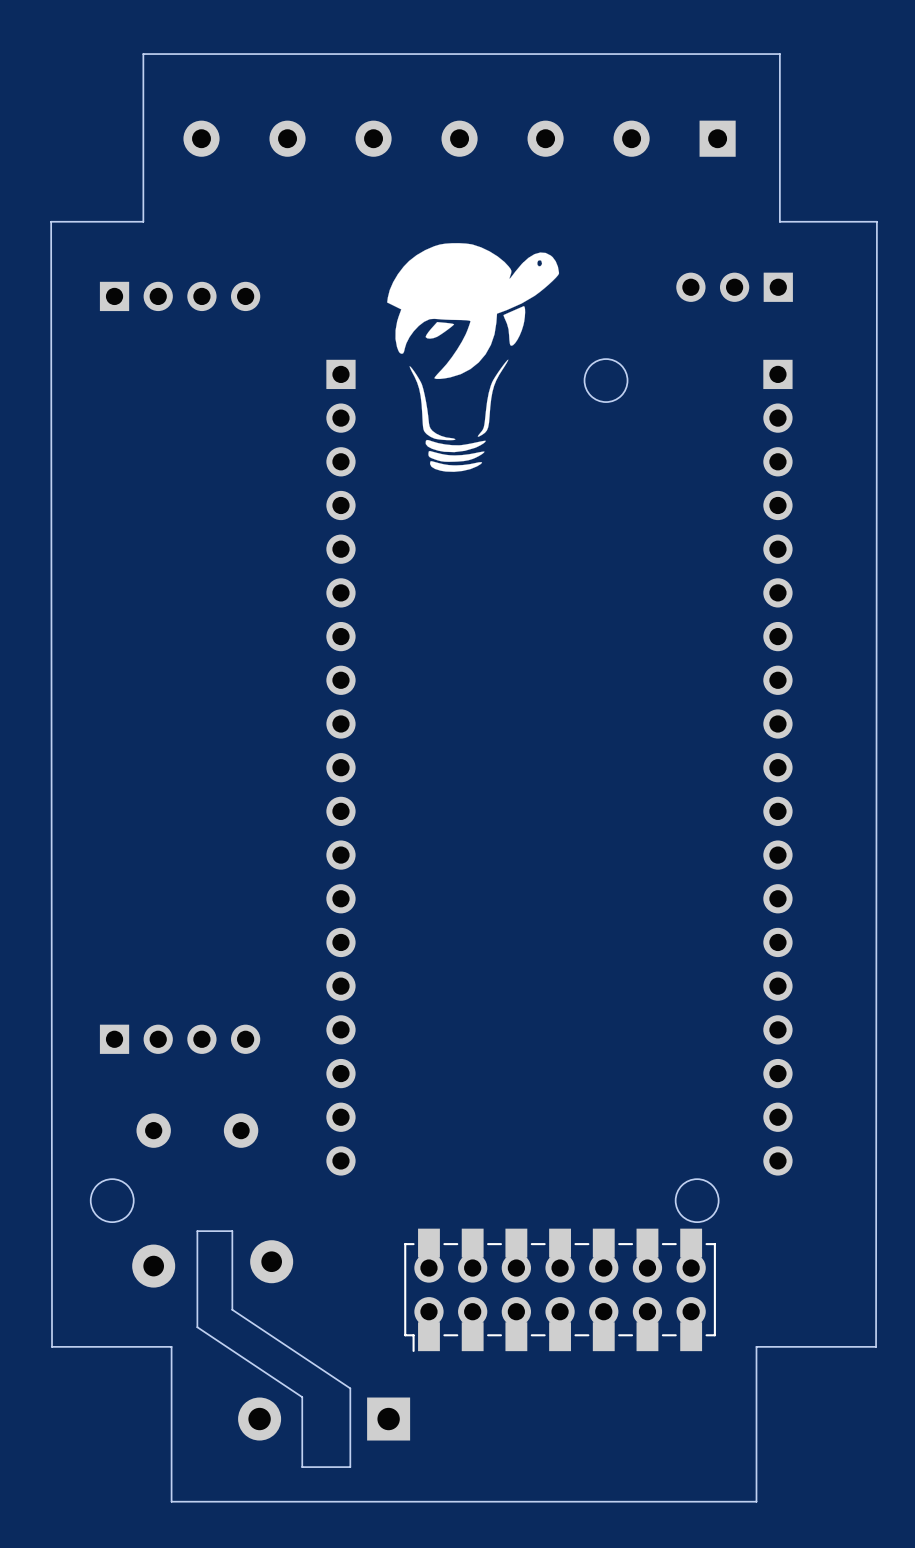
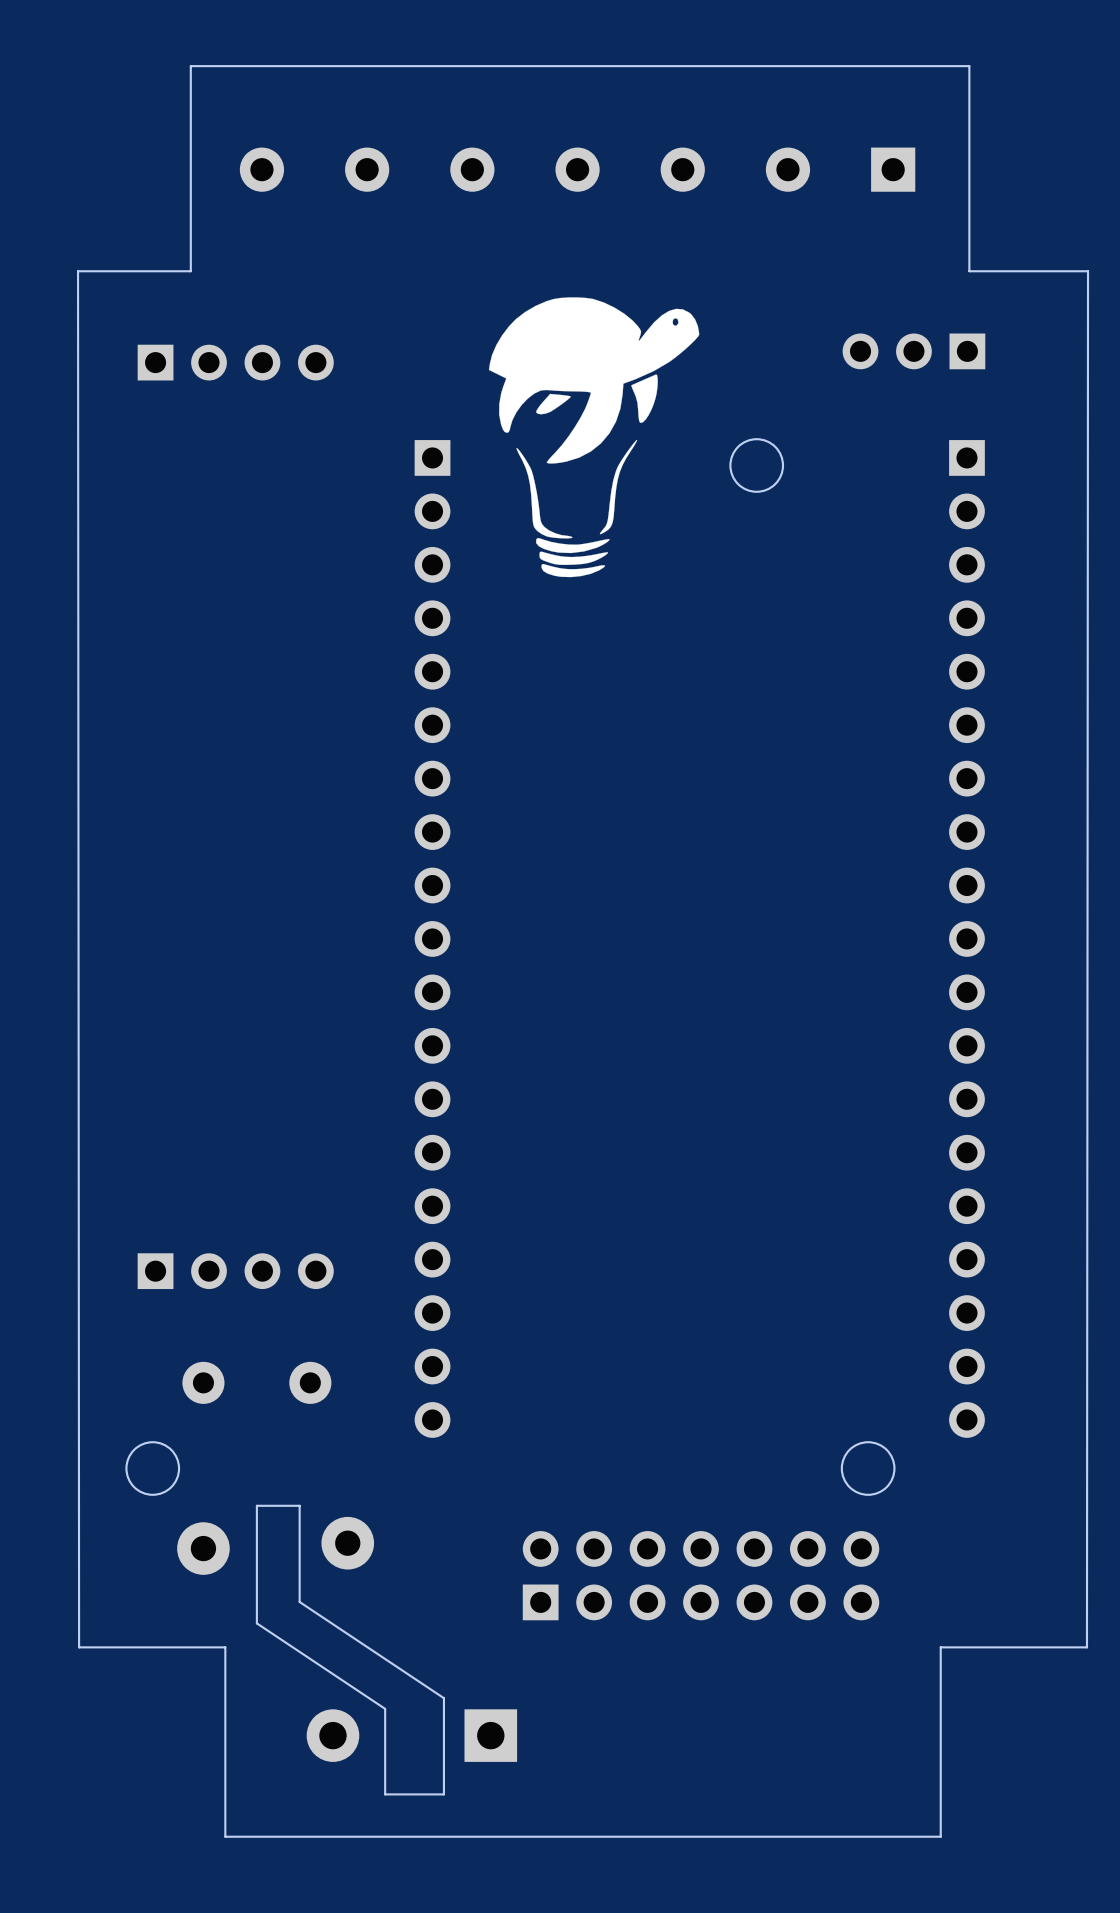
part footprint: [404, 1228, 716, 1352] -> [522, 1531, 880, 1621]

